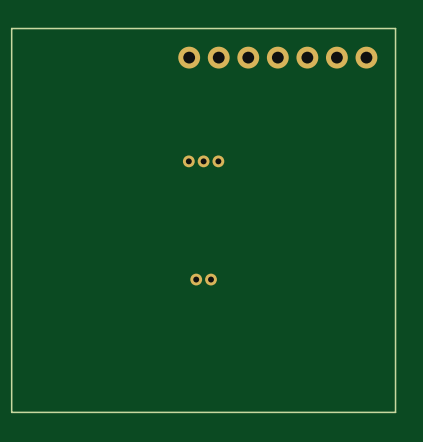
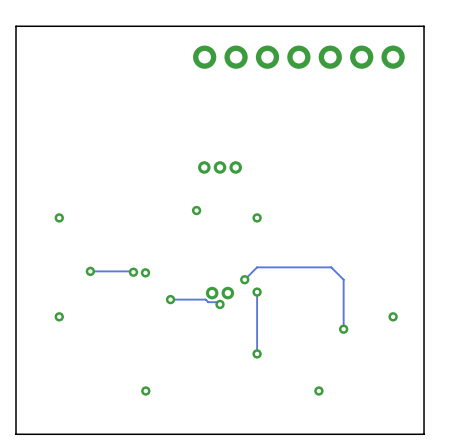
via: none -> (196, 210)
via: none -> (59, 217)
via: none -> (257, 217)
track: none -> (90, 271) (133, 272)
via: none -> (90, 271)
via: none -> (133, 272)
via: none -> (145, 272)
track: none -> (244, 279) (257, 267) (331, 267) (343, 279) (343, 329)
via: none -> (244, 279)
track: none -> (257, 292) (257, 353)
via: none -> (257, 292)
track: none -> (170, 299) (205, 299) (208, 302) (217, 302) (220, 304)
via: none -> (170, 299)
via: none -> (220, 304)
via: none -> (59, 316)
via: none -> (393, 316)
via: none -> (343, 329)
via: none -> (257, 353)
via: none -> (145, 391)
via: none -> (318, 391)

